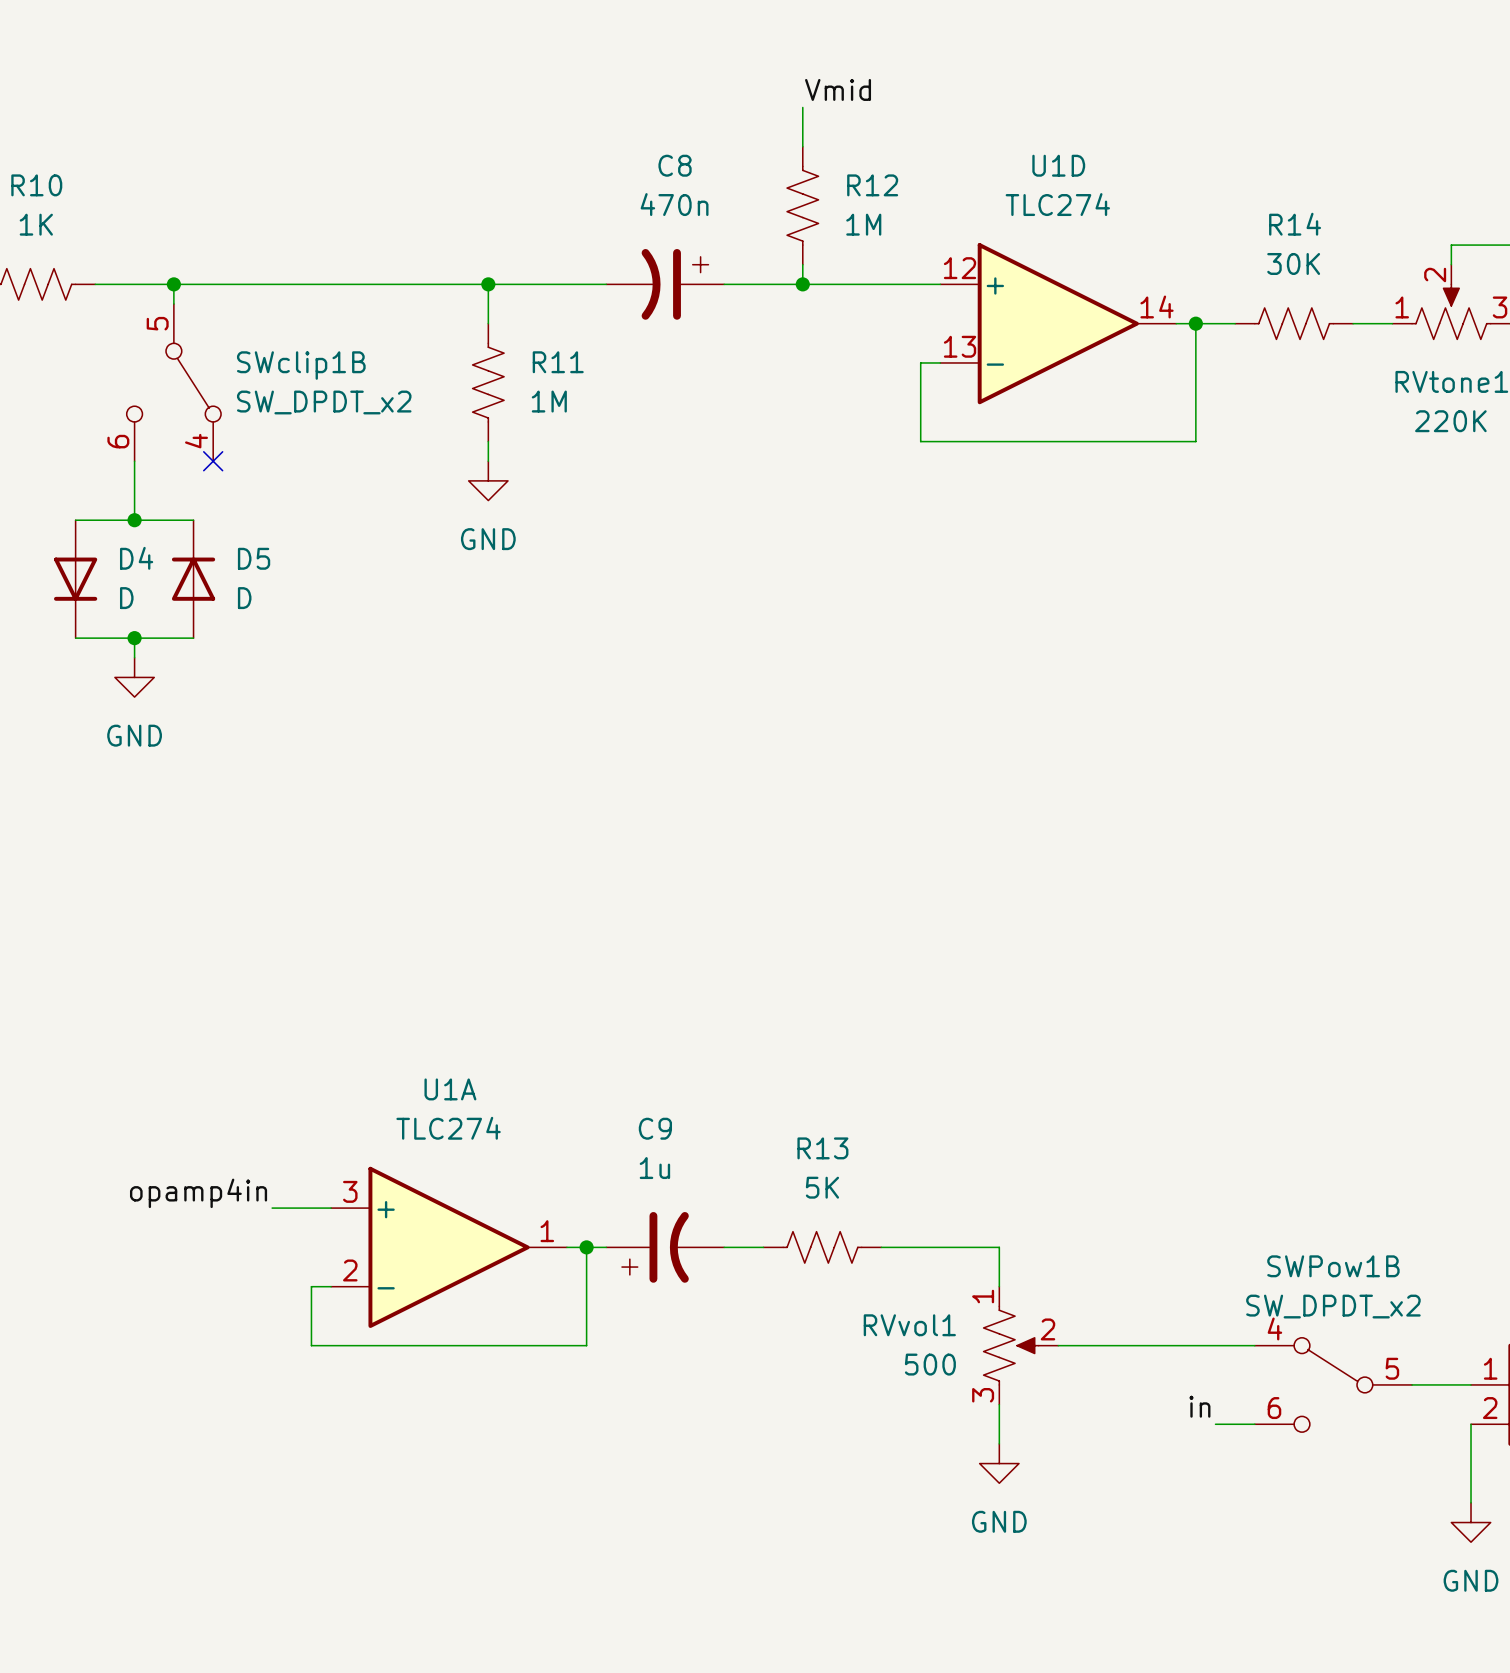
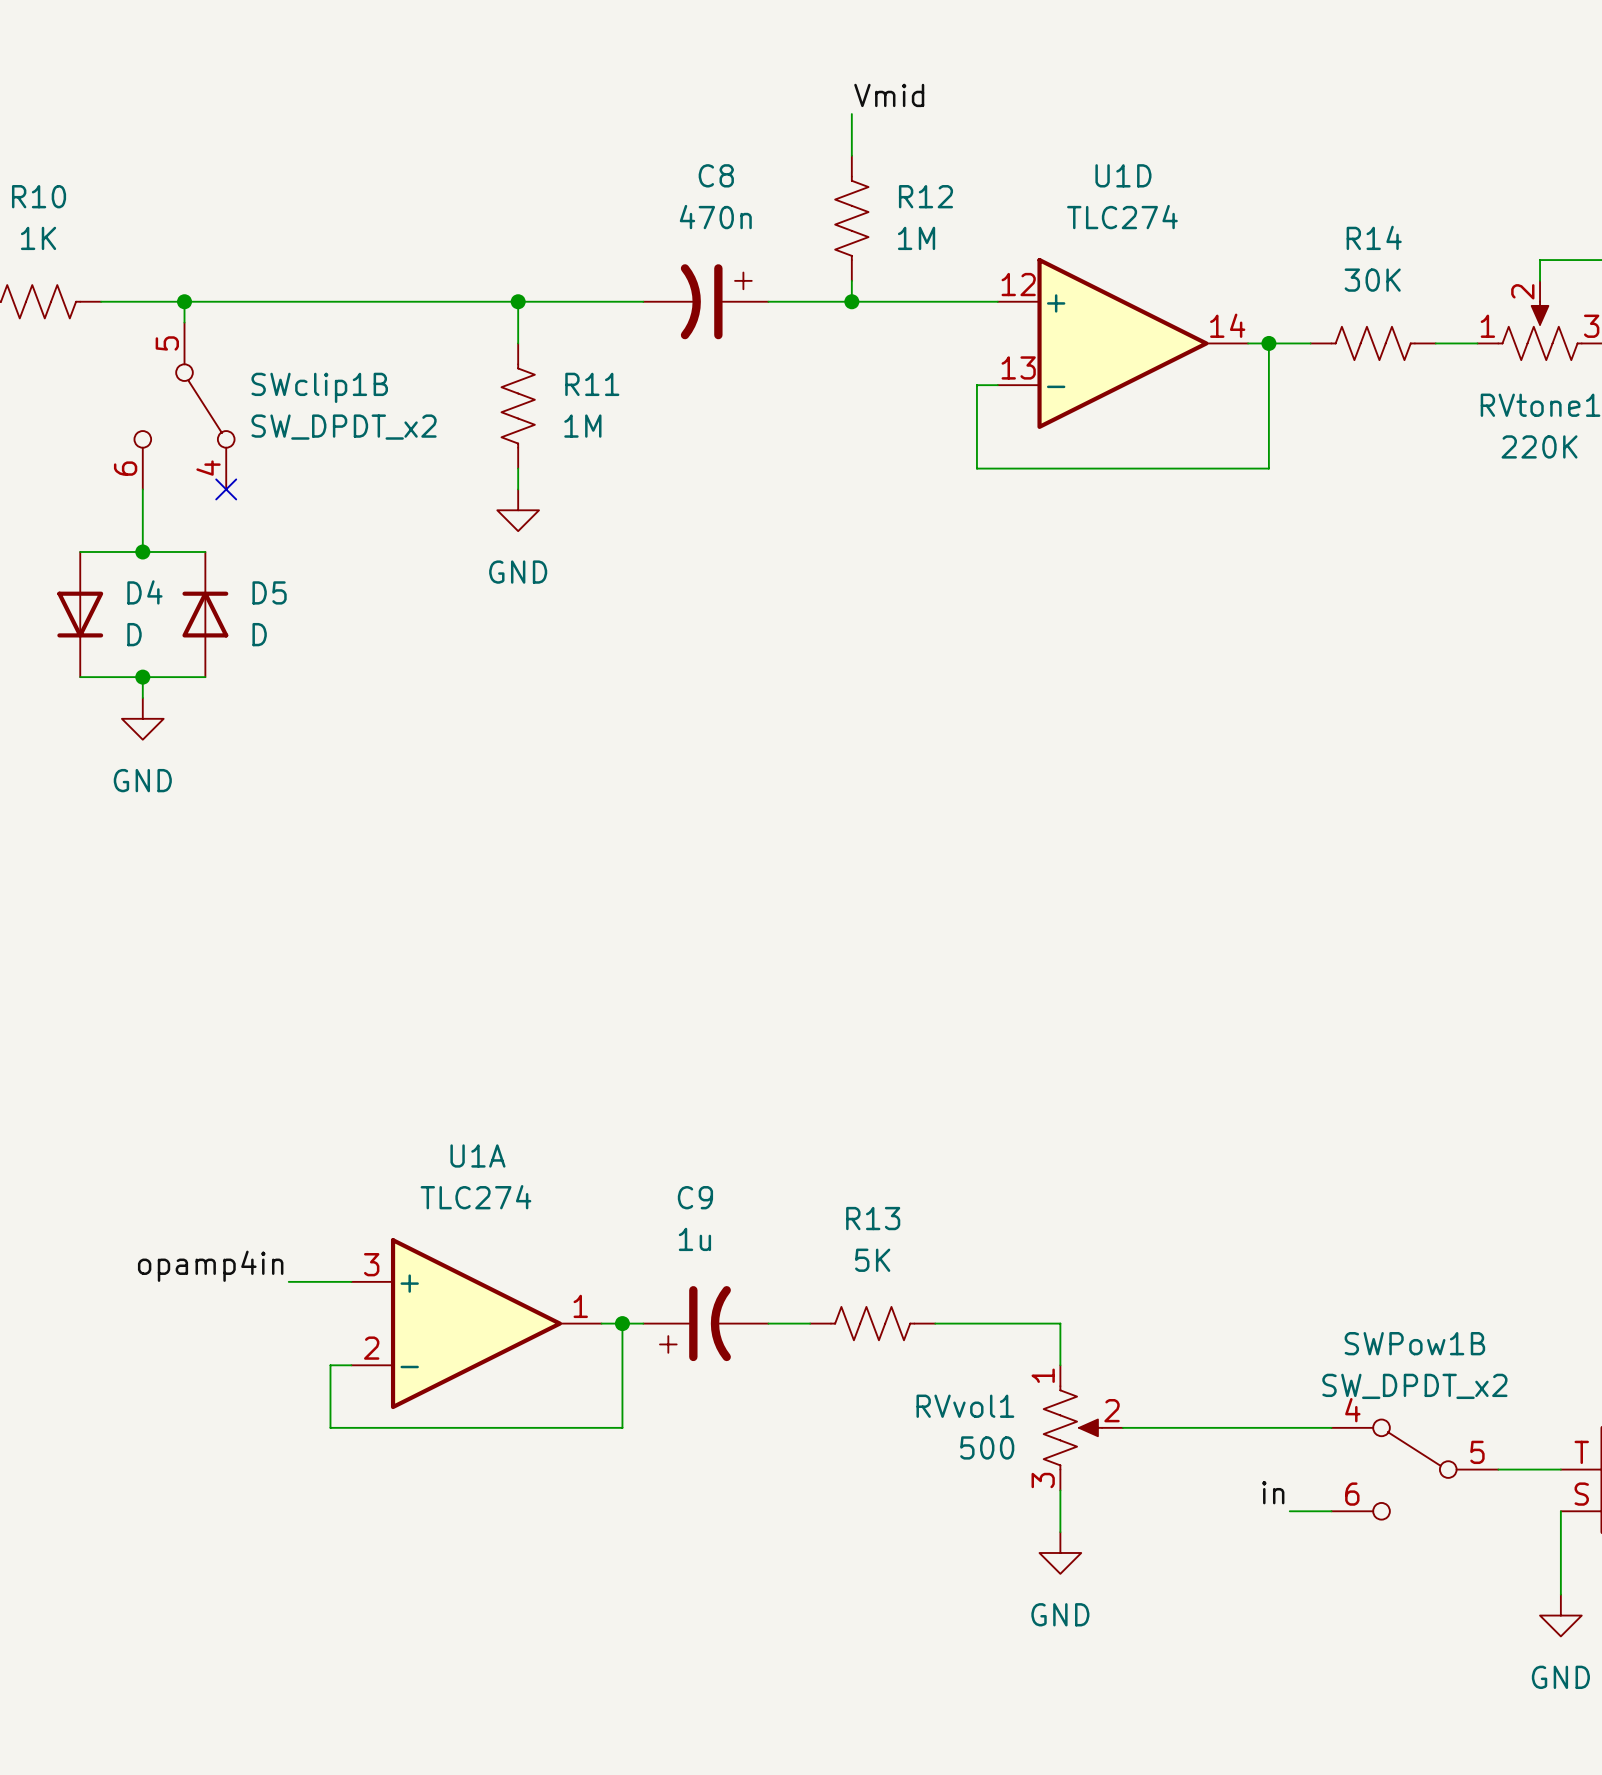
part pin number: 1 (1490, 1368) -> T (1581, 1452)
part pin number: 2 (1490, 1408) -> S (1581, 1494)

